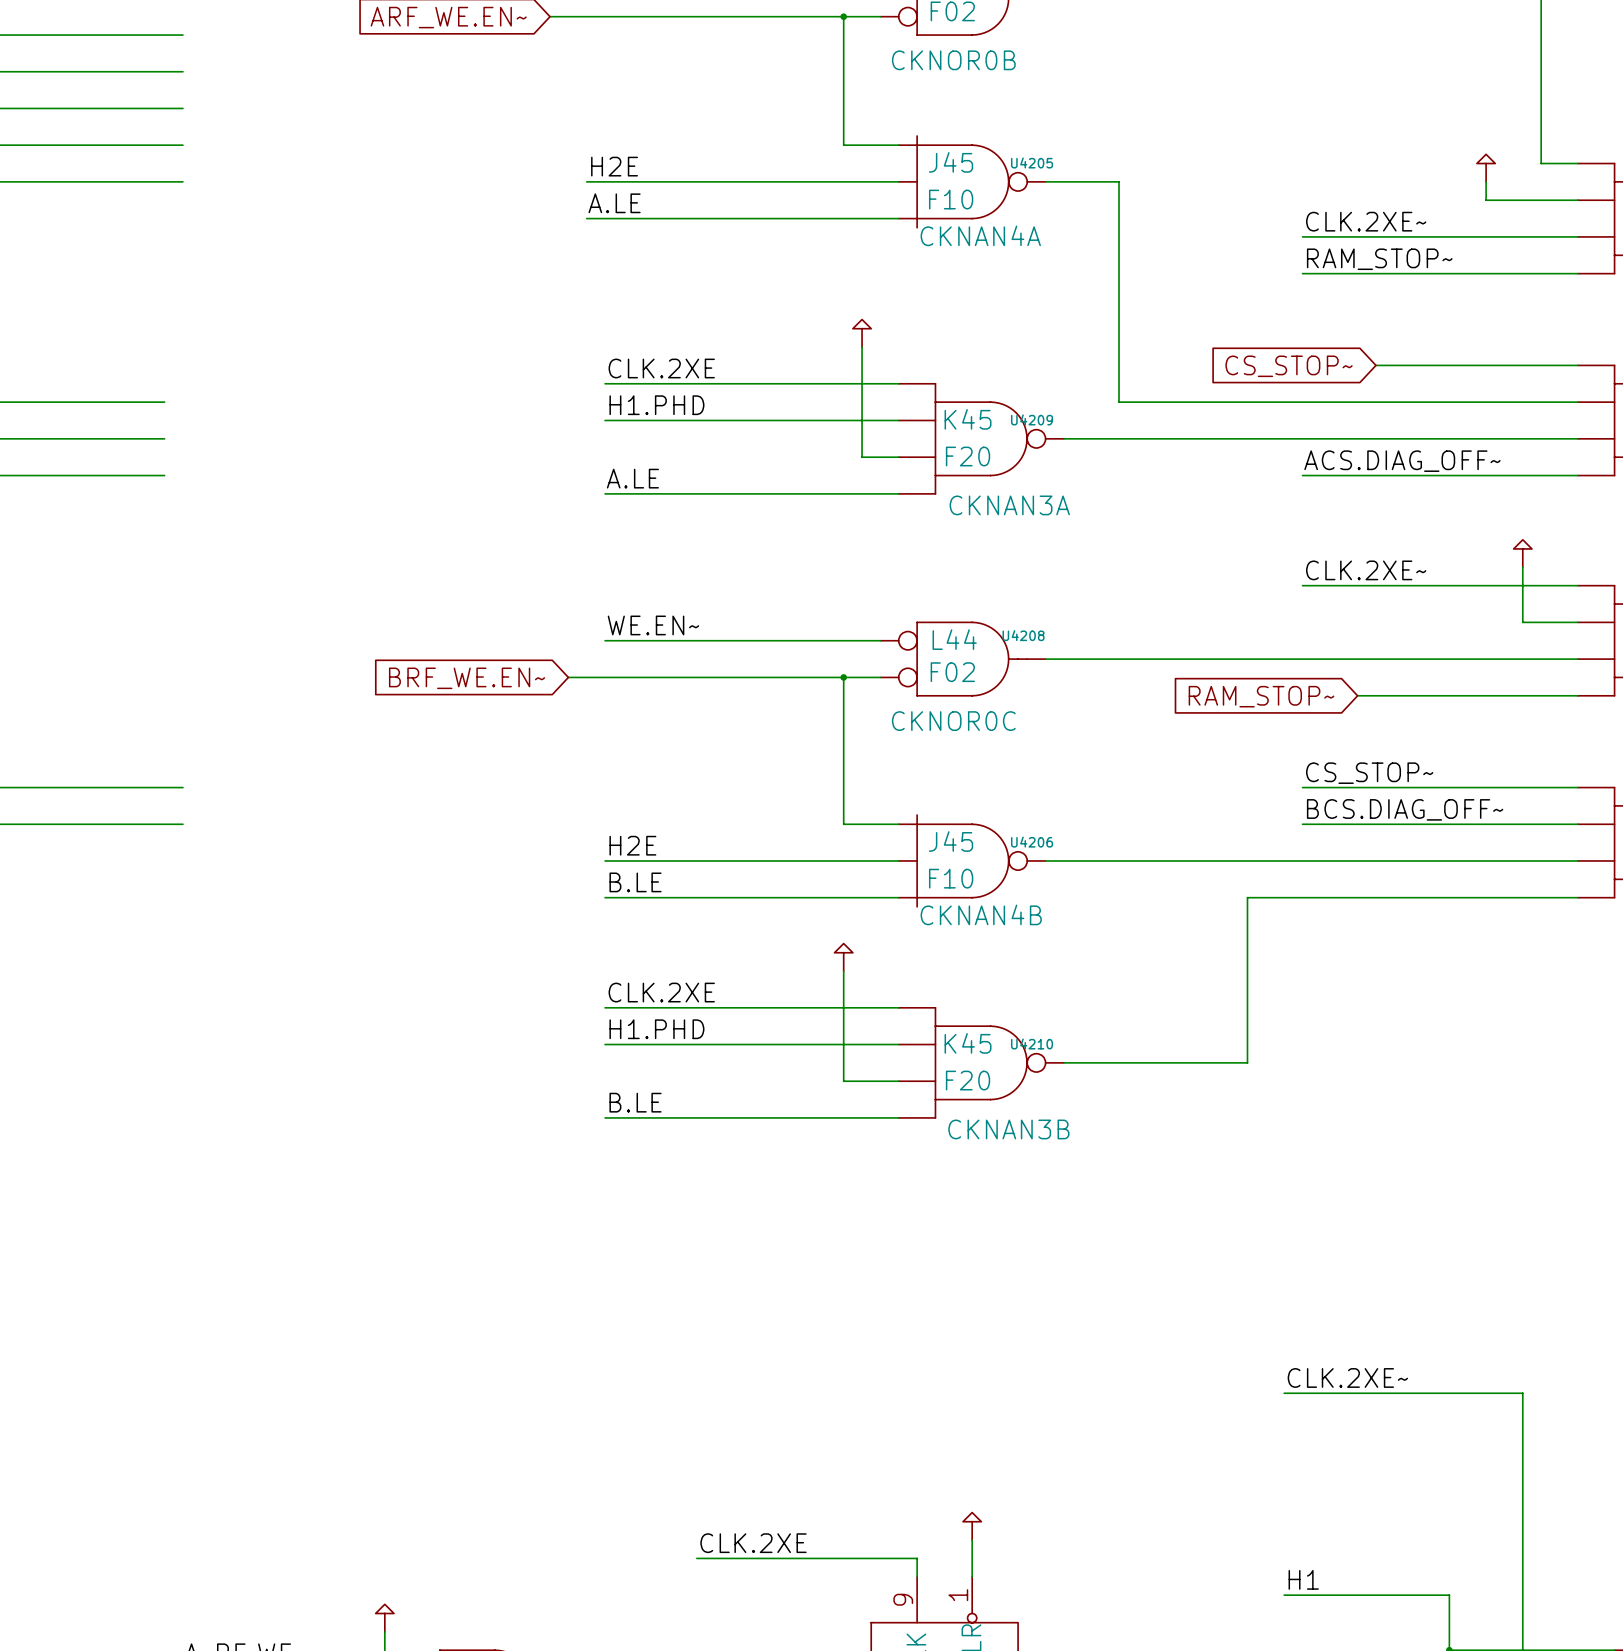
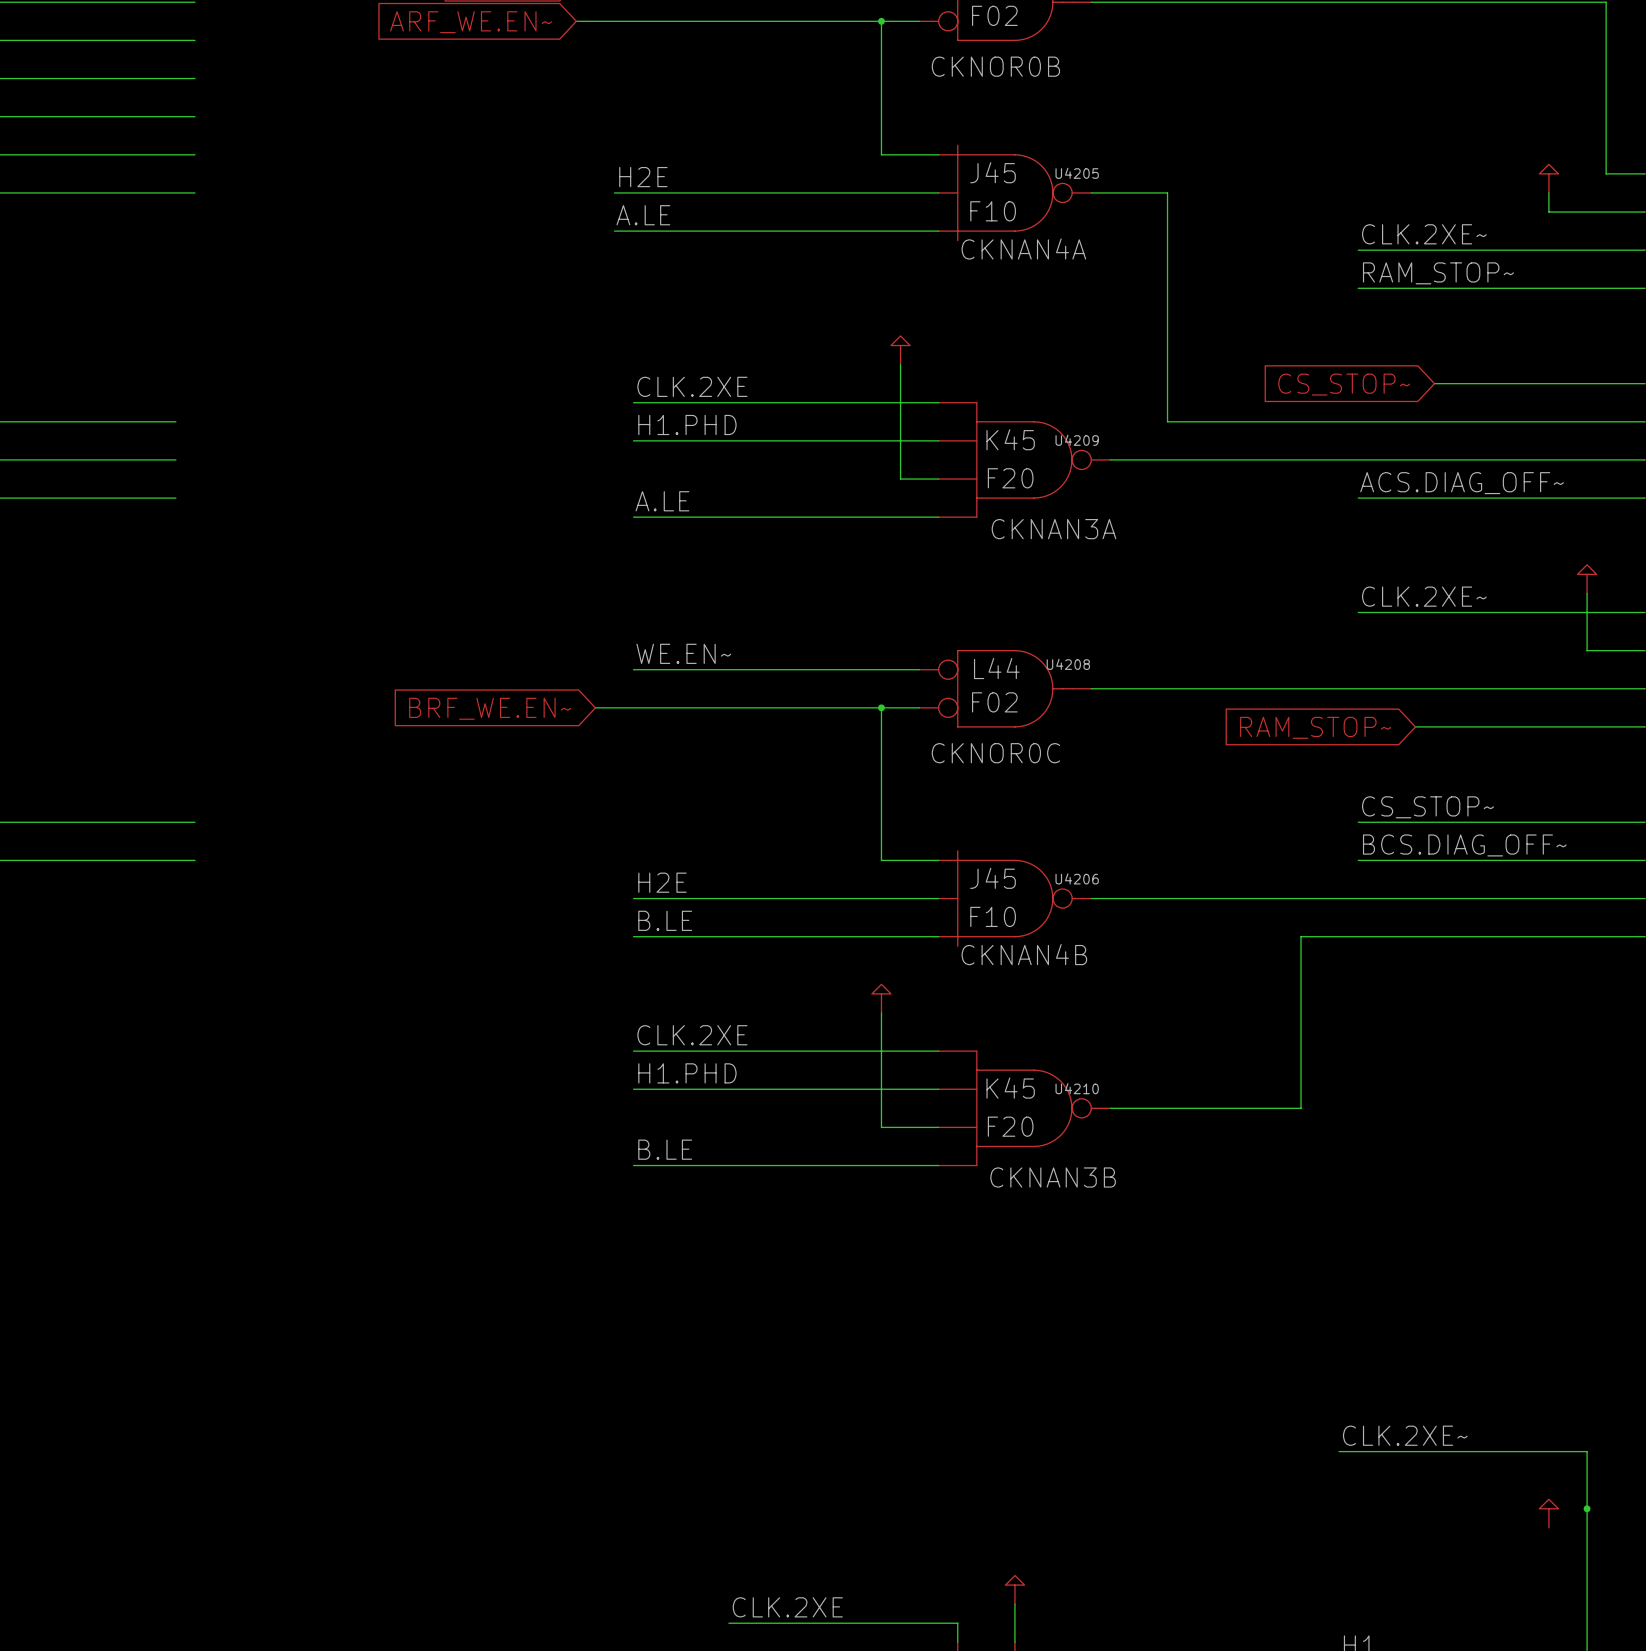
junction: none -> (1587, 1508)
power symbol: none -> (1548, 1513)

